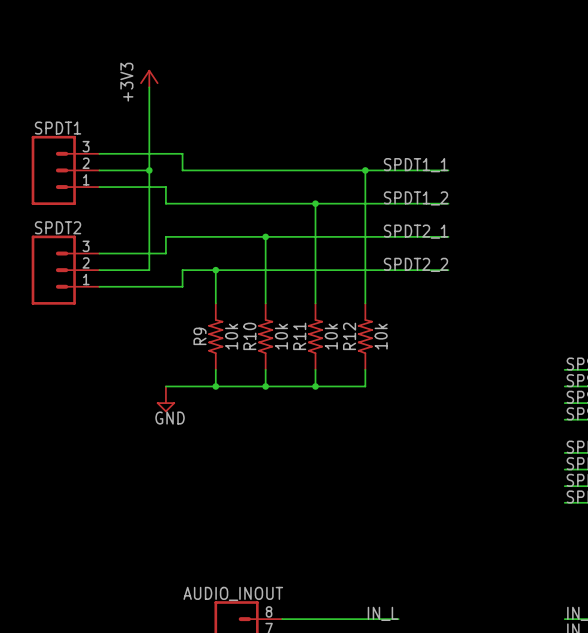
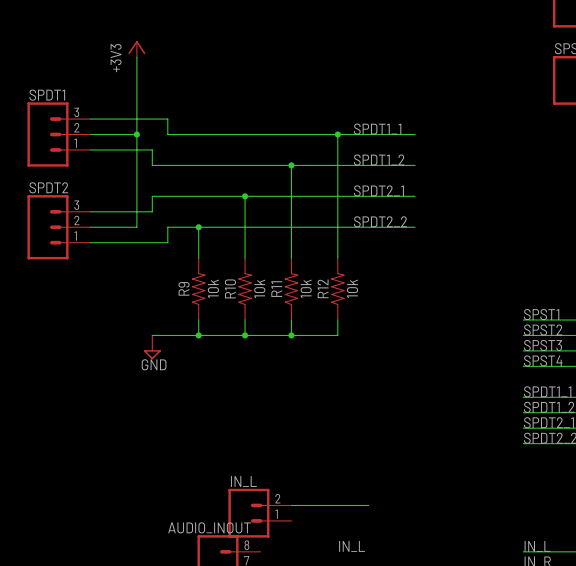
wire: none -> (291, 505) (368, 505)
IN_L: none -> (259, 513)
wire: (282, 619) (398, 619) -> none

